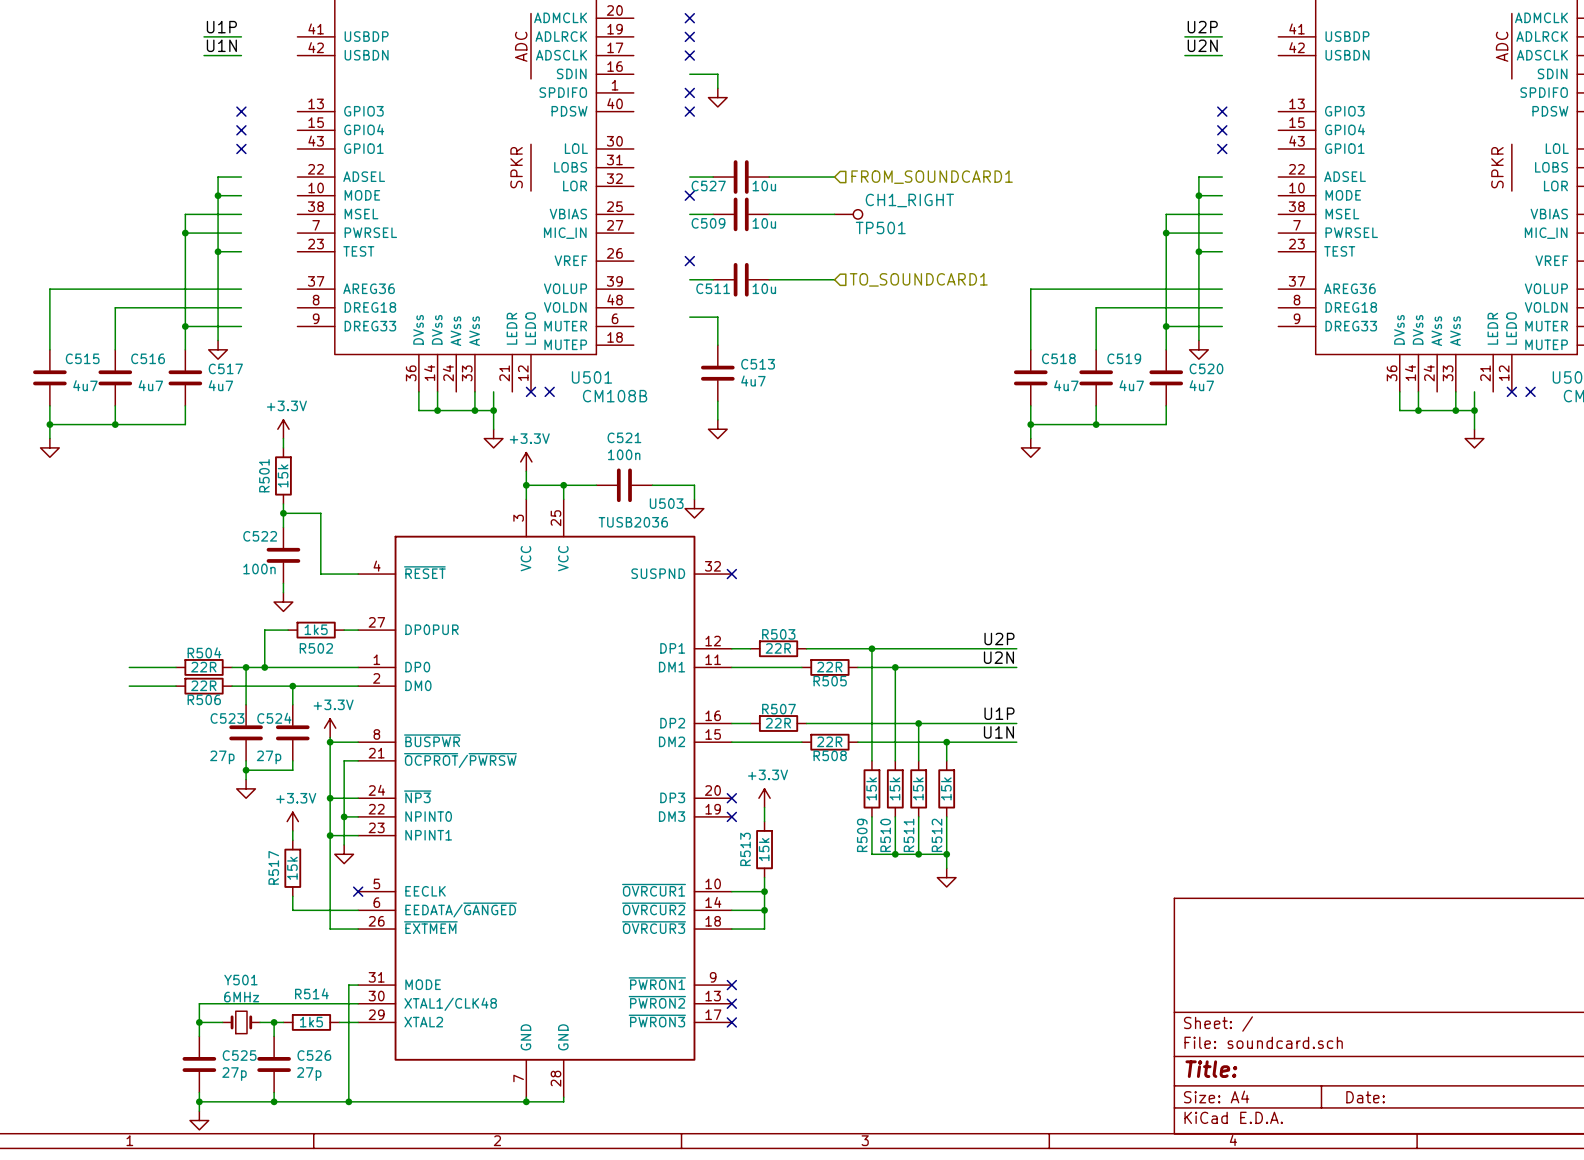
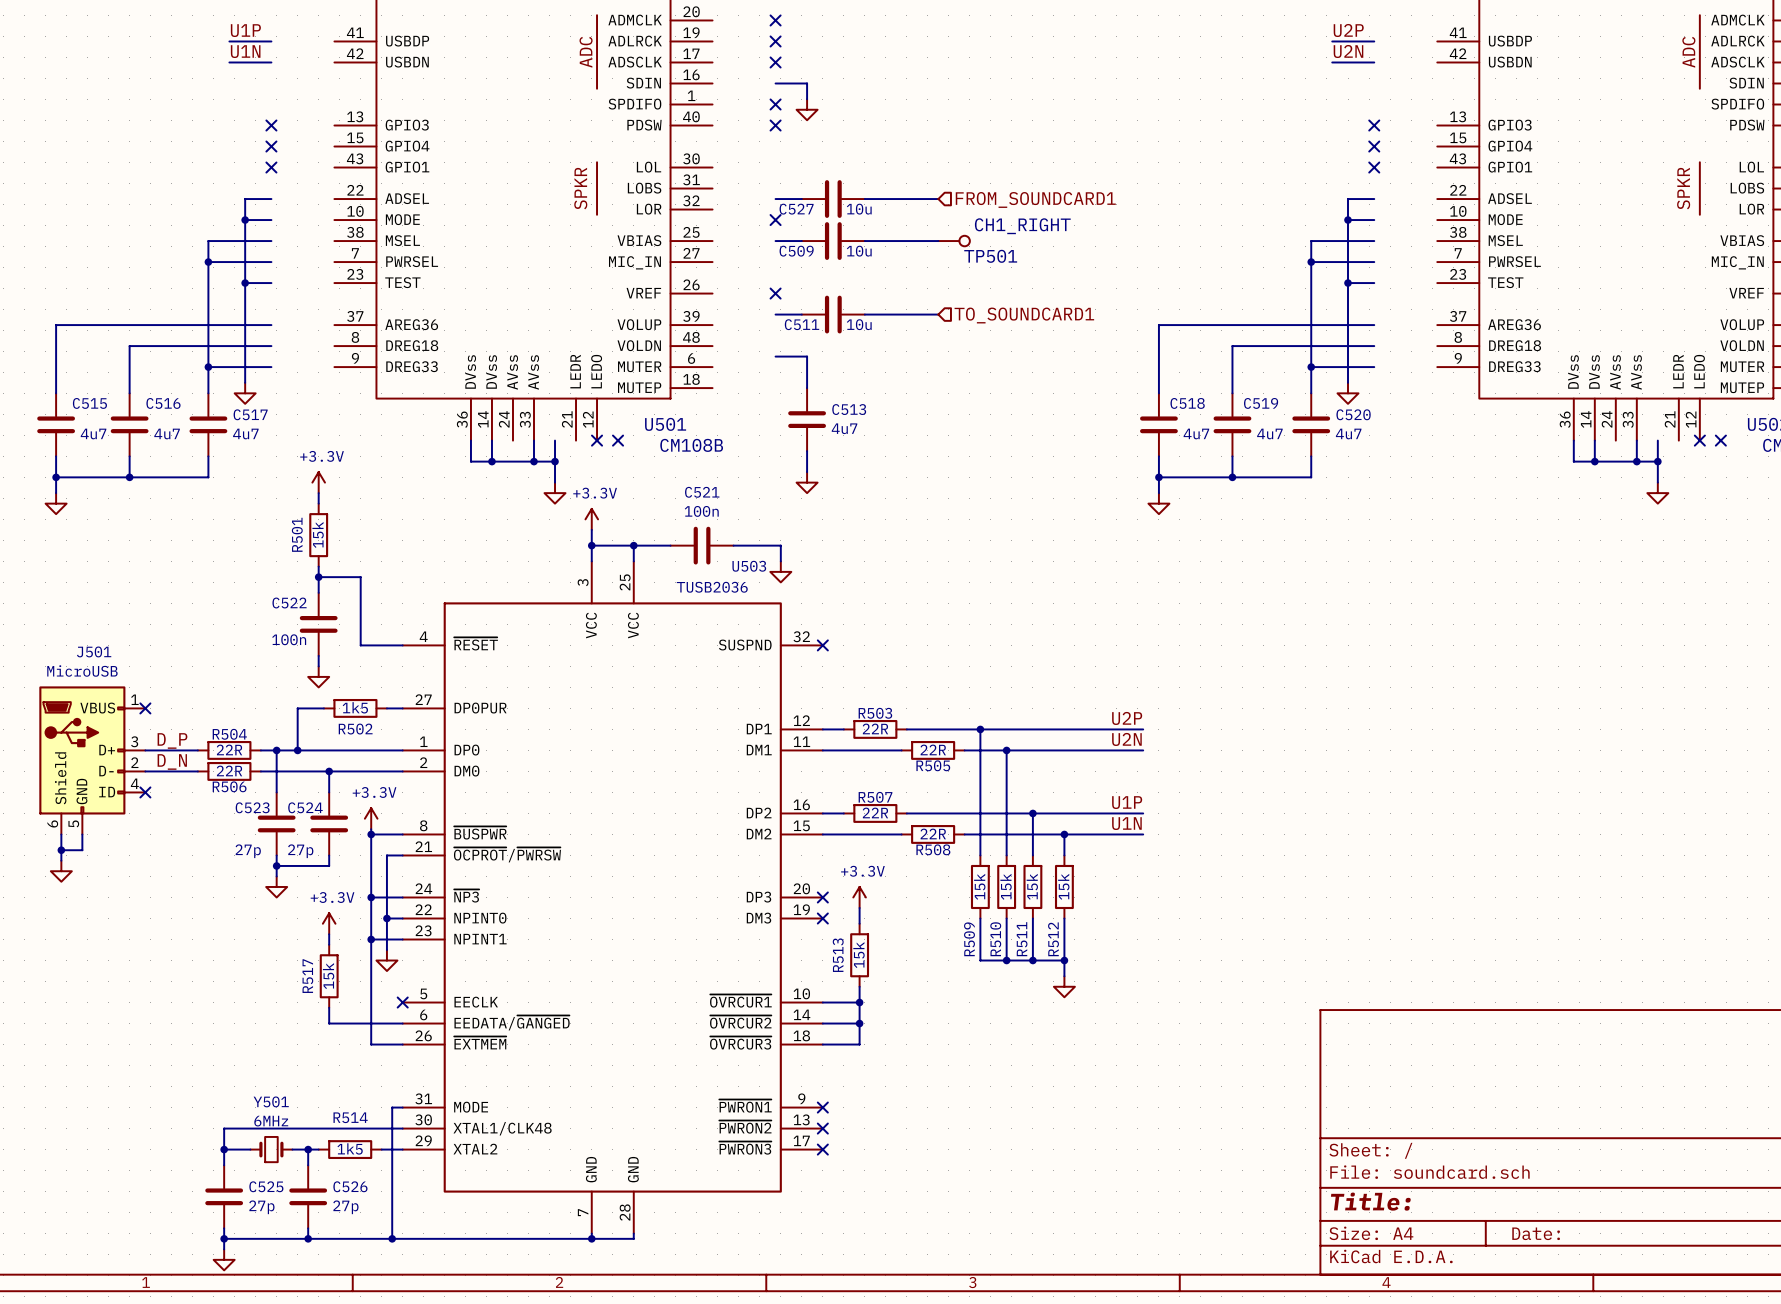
no-connect mark: none -> (145, 708)
label: none -> D_P (172, 740)
J501: none -> MicroUSB (92, 760)
label: none -> D_N (172, 761)
no-connect mark: none -> (145, 792)
wire: none -> (61, 834) (61, 860)
wire: none -> (82, 834) (82, 850) (61, 850)
junction: none -> (61, 850)
power symbol: none -> (61, 871)

